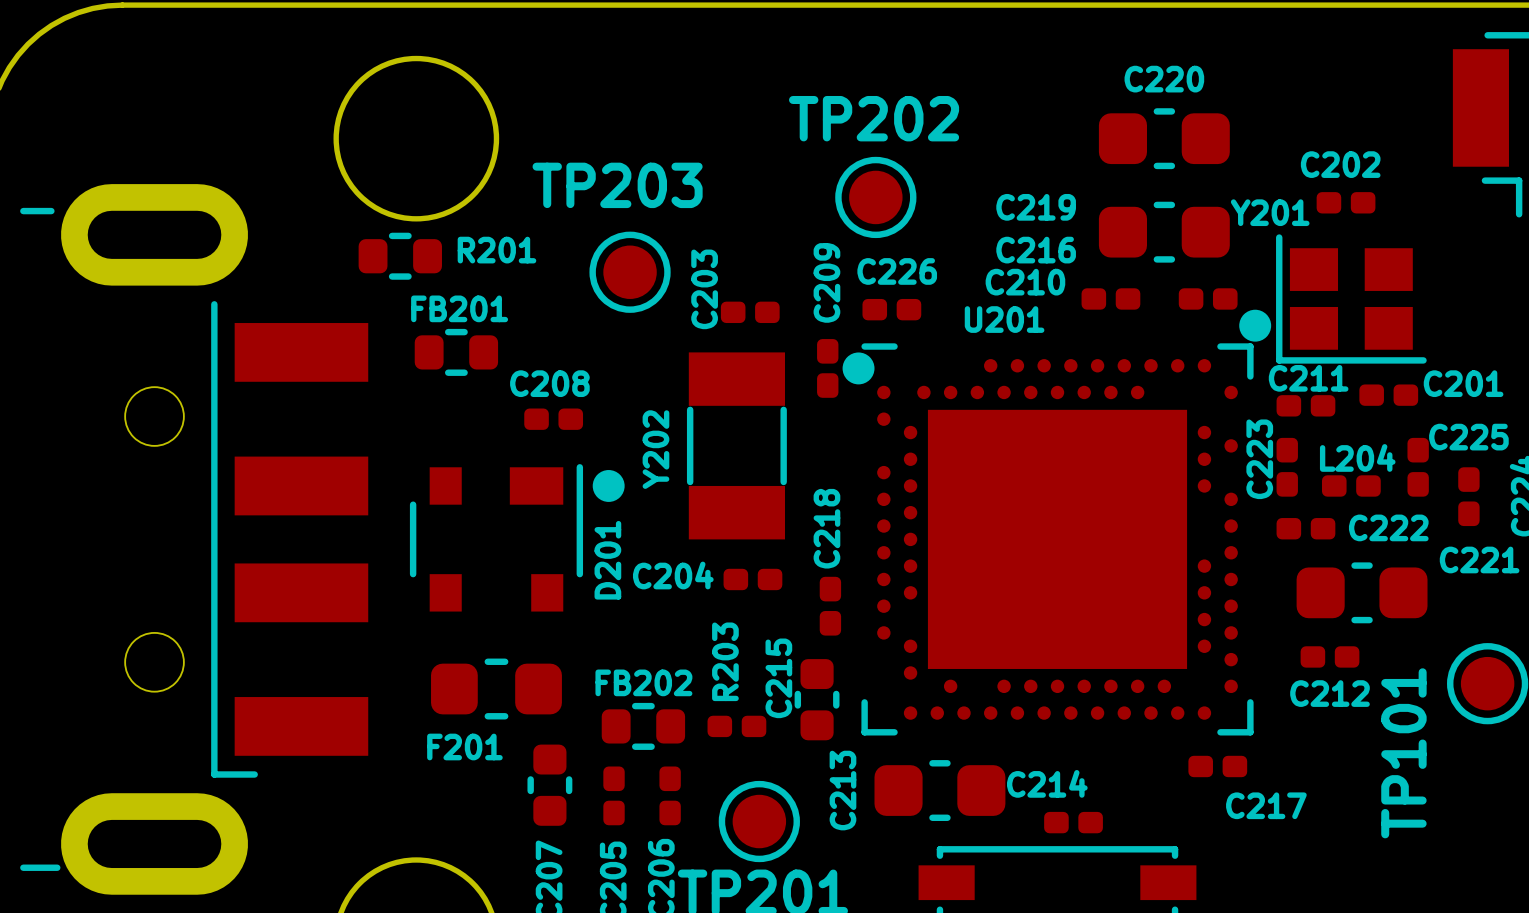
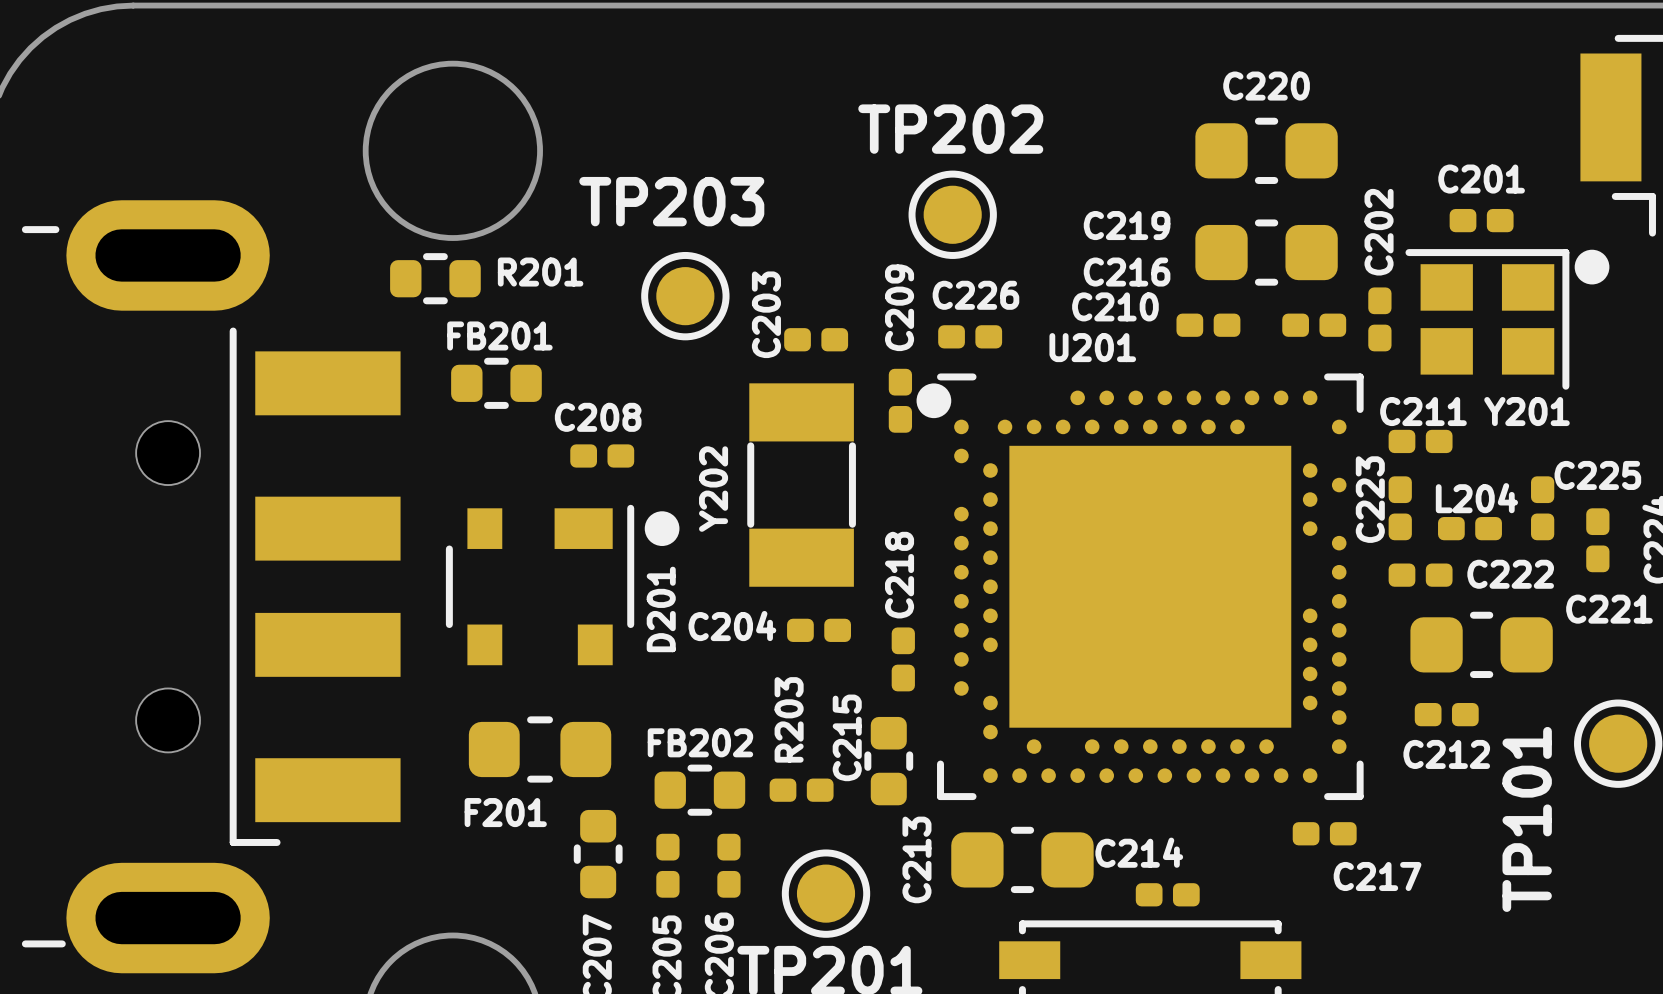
C202 rotation: 0° (1346, 202) -> 90° clockwise (1379, 319)
C202 position: (1346, 202) -> (1379, 319)
Y201 rotation: 0° (1351, 298) -> 180° (1487, 319)
drawing position: (1255, 325) -> (1592, 267)
C201 name position: C201 (1463, 383) -> C201 (1481, 179)
C201 position: (1388, 395) -> (1481, 220)

